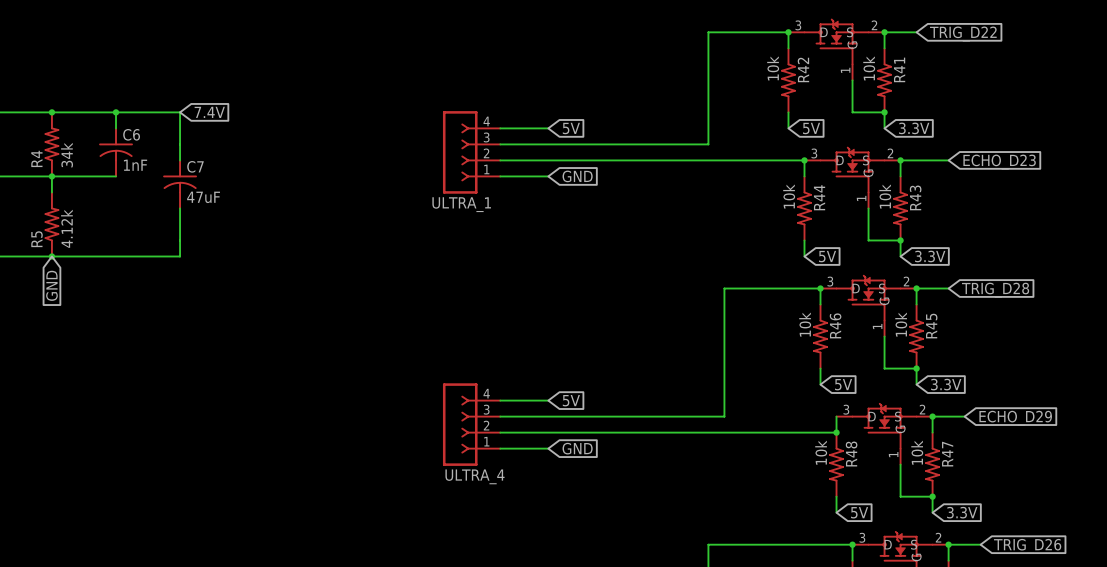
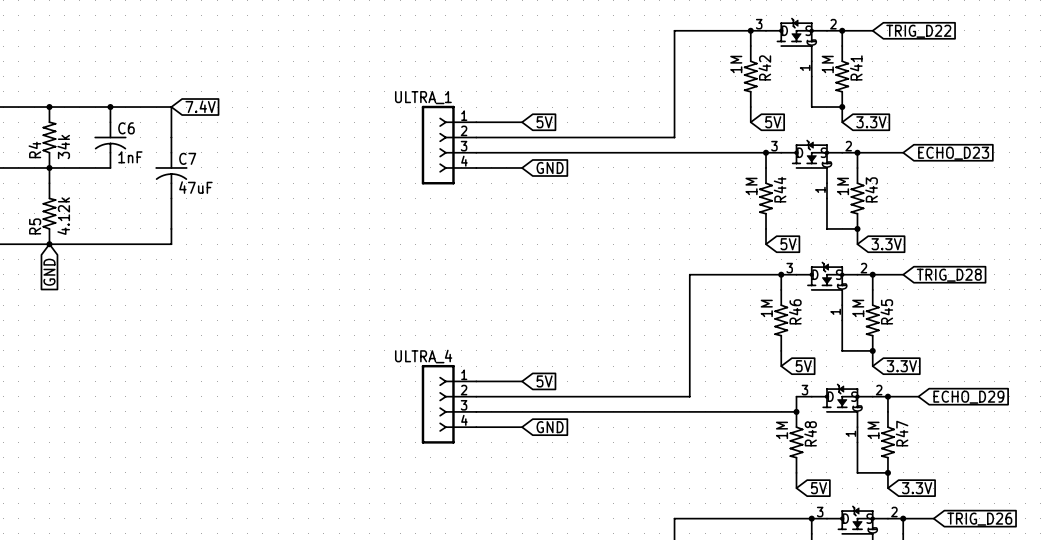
R42 value: 10k (773, 68) -> 1M (736, 64)
R41 value: 10k (869, 68) -> 1M (827, 64)
ULTRA_1 flip: as is (460, 152) -> up-down (438, 145)
R44 value: 10k (789, 196) -> 1M (751, 186)
R43 value: 10k (885, 196) -> 1M (842, 186)
ULTRA_1 name position: ULTRA_1 (461, 204) -> ULTRA_1 (423, 97)
R46 value: 10k (805, 324) -> 1M (766, 308)
R45 value: 10k (901, 324) -> 1M (858, 308)
ULTRA_4 flip: as is (460, 424) -> up-down (438, 404)
R48 value: 10k (821, 452) -> 1M (782, 430)
R47 value: 10k (917, 452) -> 1M (873, 430)
ULTRA_4 name position: ULTRA_4 (474, 476) -> ULTRA_4 (423, 356)

